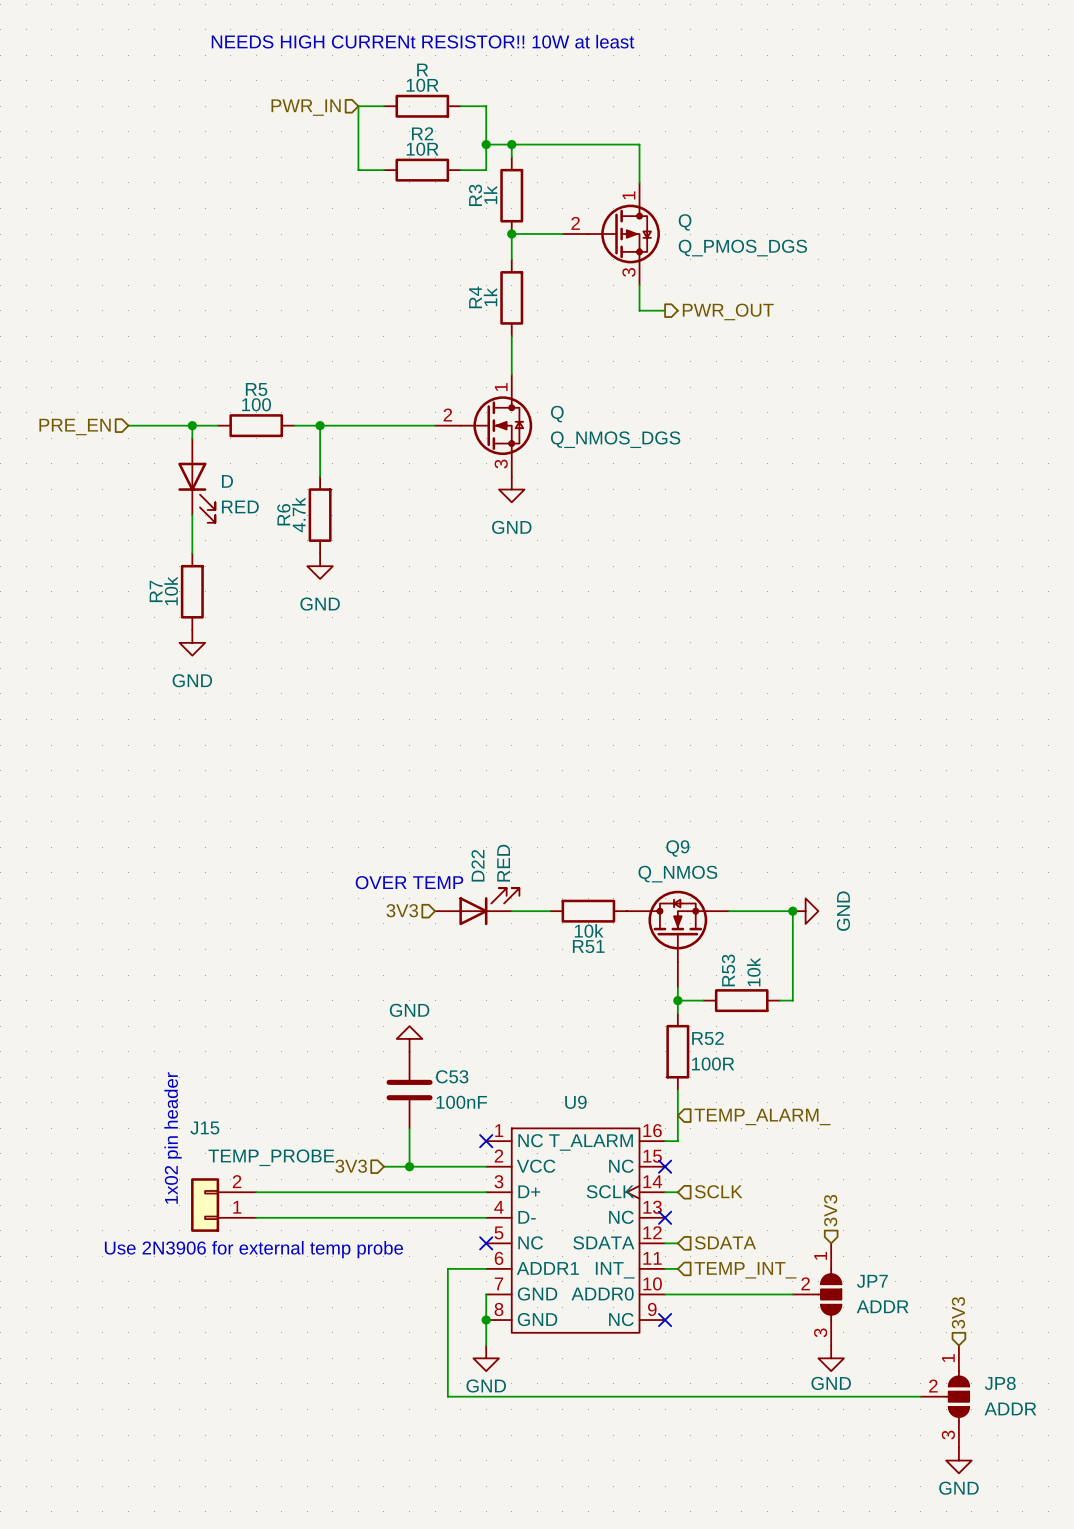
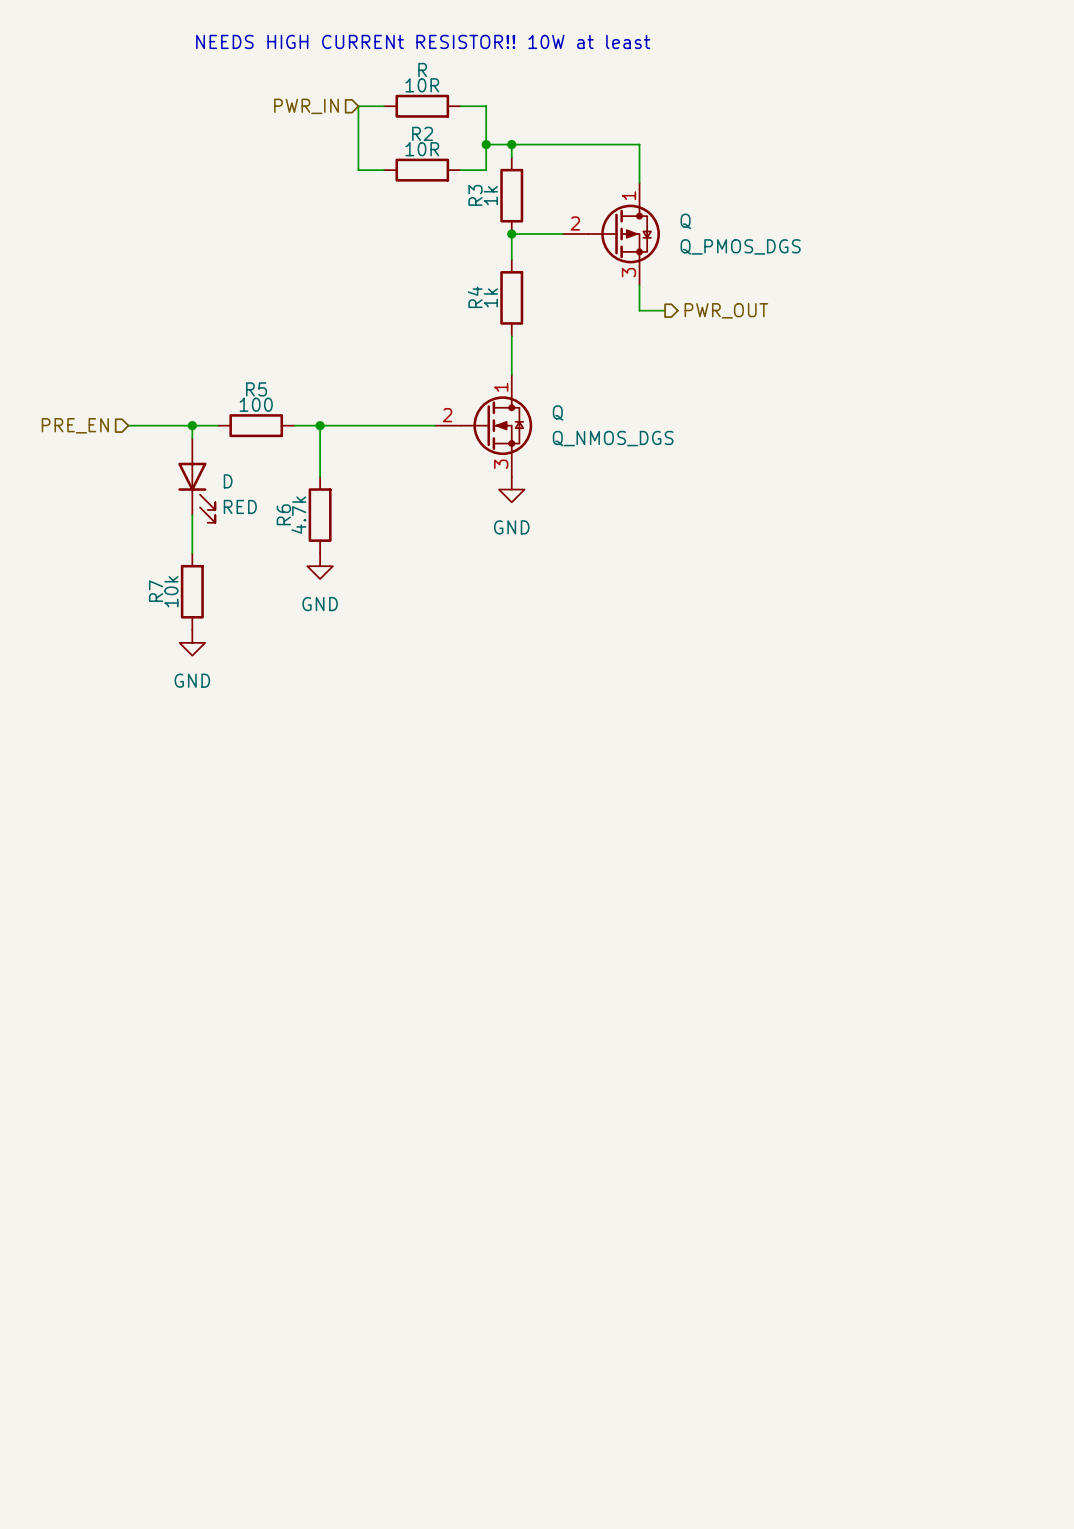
text: OVER TEMP (409, 882) -> none
D22: RED (477, 906) -> none
hierarchical label: 3V3 (402, 910) -> none
wire: (511, 911) (550, 911) -> none
R51: 10k (588, 911) -> none
wire: (728, 911) (792, 911) (792, 1000) (780, 1000) -> none
junction: (792, 911) -> none
power symbol: GND (805, 911) -> none
Q9: Q_NMOS (677, 939) -> none
wire: (677, 987) (677, 1013) -> none
wire: (677, 1000) (703, 1000) -> none
junction: (677, 1000) -> none
R53: 10k (741, 1000) -> none
power symbol: GND (409, 1038) -> none
R52: 100R (677, 1051) -> none
C53: 100nF (409, 1090) -> none
wire: (677, 1090) (677, 1141) (665, 1141) -> none
hierarchical label: TEMP_ALARM_ (762, 1116) -> none
wire: (409, 1128) (409, 1166) -> none
text: 1x02 pin header (173, 1138) -> none
no-connect mark: (486, 1141) -> none
hierarchical label: 3V3 (351, 1166) -> none
wire: (383, 1166) (486, 1166) -> none
junction: (409, 1166) -> none
no-connect mark: (665, 1166) -> none
hierarchical label: SCLK (718, 1191) -> none
wire: (256, 1192) (486, 1192) -> none
wire: (665, 1192) (677, 1192) -> none
J15: TEMP_PROBE (223, 1205) -> none
hierarchical label: 3V3 (830, 1210) -> none
wire: (256, 1217) (486, 1217) -> none
no-connect mark: (665, 1217) -> none
U9: (575, 1230) -> none
hierarchical label: SDATA (725, 1242) -> none
no-connect mark: (486, 1243) -> none
wire: (665, 1243) (677, 1243) -> none
text: Use 2N3906 for external temp probe (253, 1249) -> none
wire: (486, 1268) (447, 1268) (447, 1396) (920, 1396) -> none
wire: (665, 1268) (677, 1268) -> none
hierarchical label: TEMP_INT_ (745, 1270) -> none
wire: (486, 1294) (486, 1345) -> none
wire: (665, 1294) (792, 1294) -> none
JP7: ADDR (817, 1294) -> none
hierarchical label: 3V3 (958, 1312) -> none
junction: (486, 1320) -> none
no-connect mark: (665, 1320) -> none
power symbol: GND (486, 1358) -> none
power symbol: GND (831, 1358) -> none
JP8: ADDR (945, 1396) -> none
power symbol: GND (958, 1460) -> none

